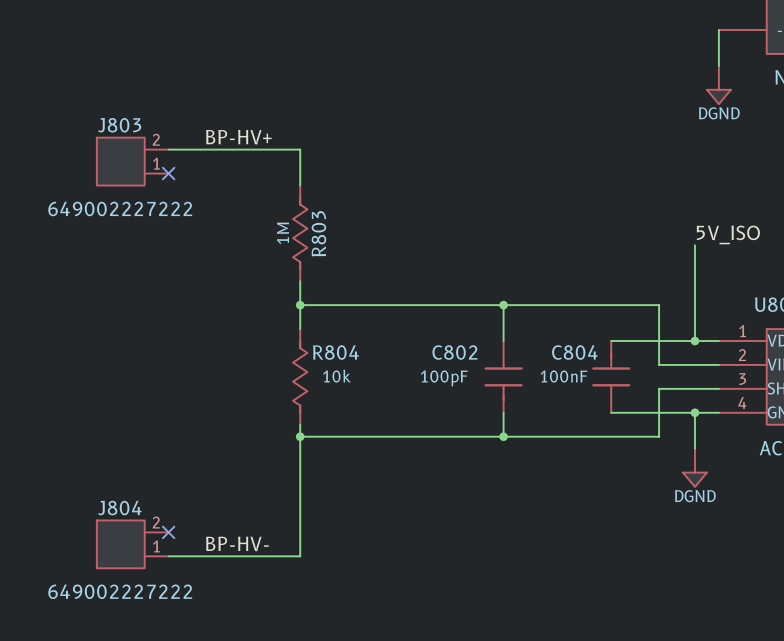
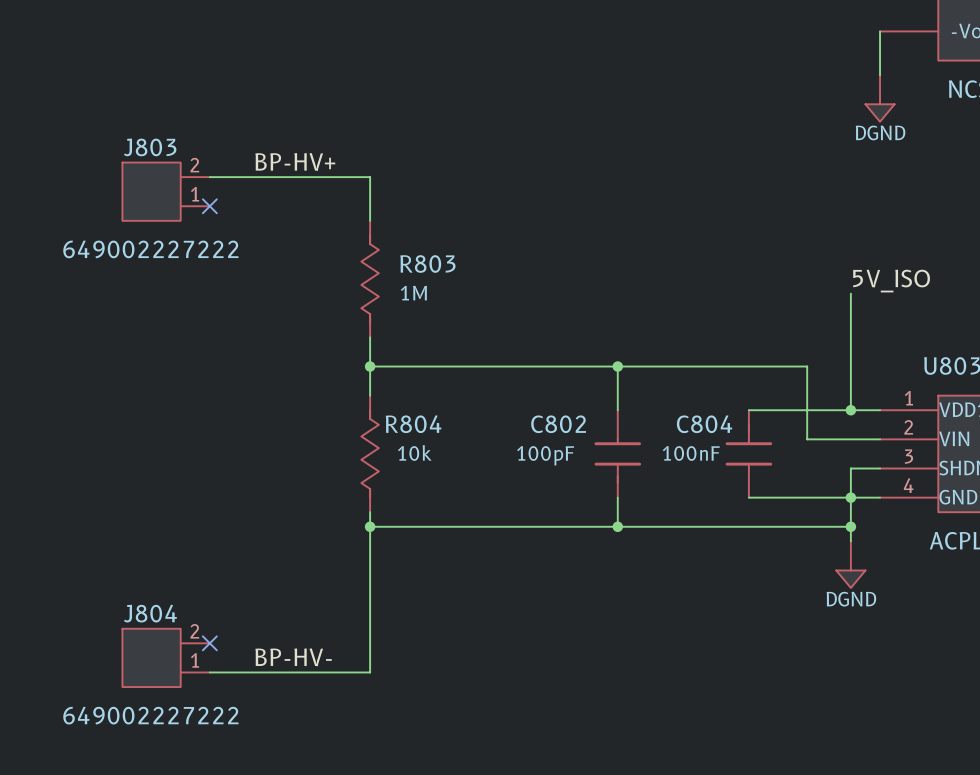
R803 text rotation: 0° (283, 233) -> 90° clockwise (413, 293)
R803 text position: 1M (283, 233) -> 1M (413, 293)
R803 name rotation: 0° (318, 233) -> 90° clockwise (427, 264)
wire: (694, 388) (659, 388) (659, 436) -> (850, 468) (850, 497)
wire: none -> (807, 526) (850, 526)
junction: none -> (850, 526)

